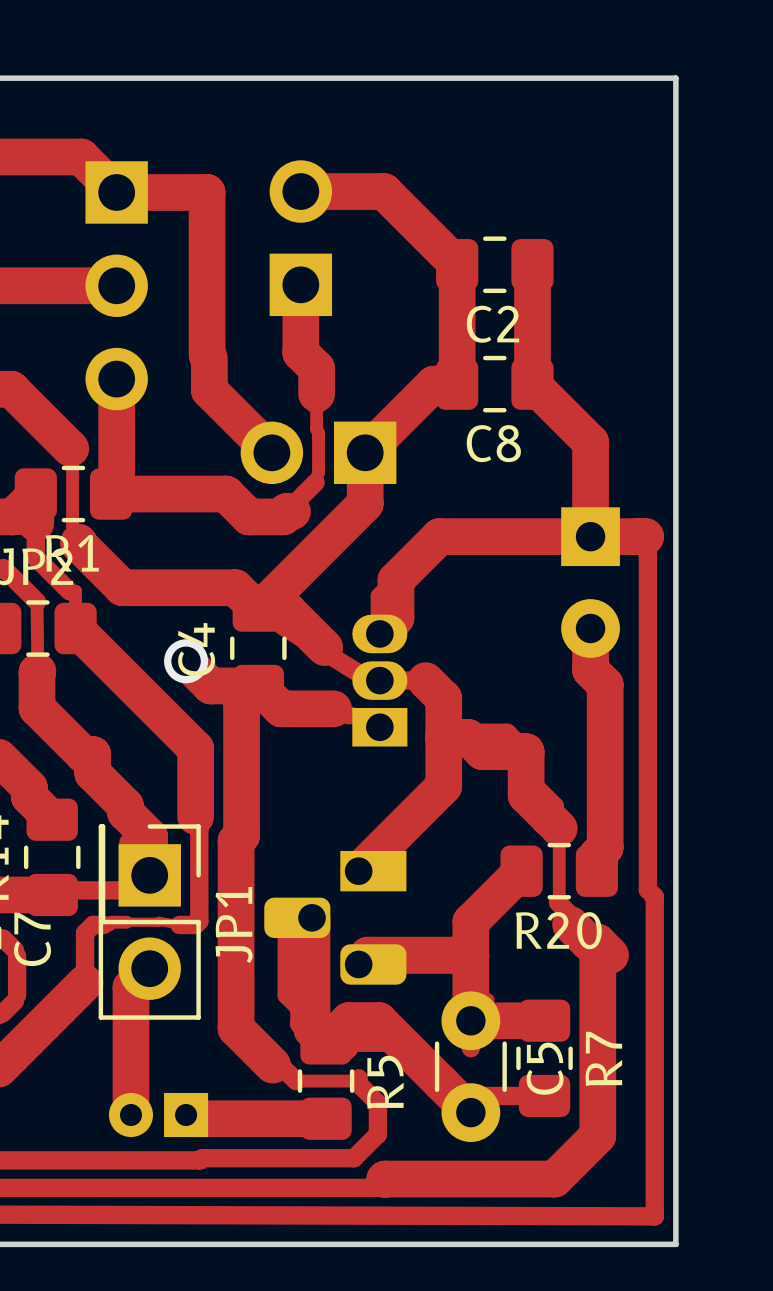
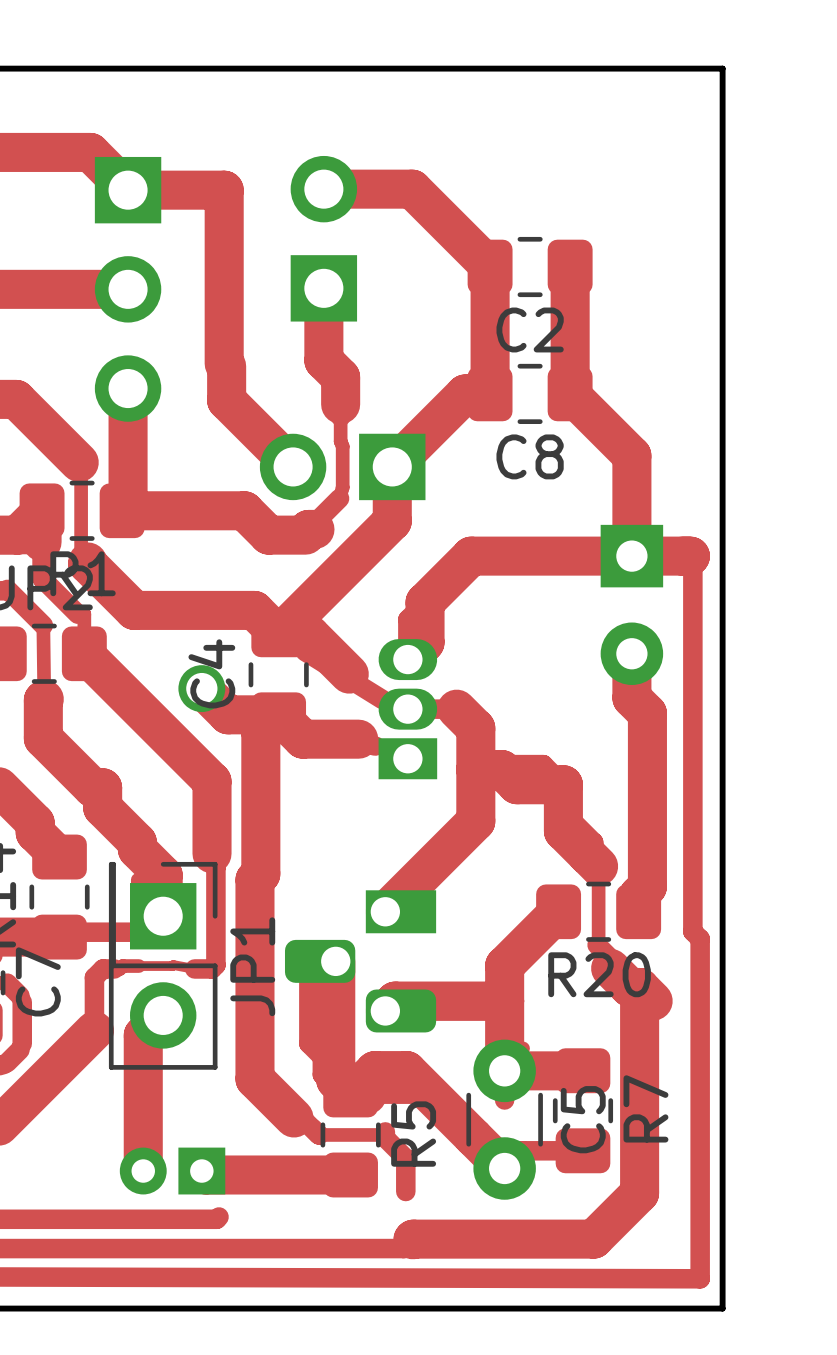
track: (377, 1134) (353, 1158) (202, 1158) -> none

